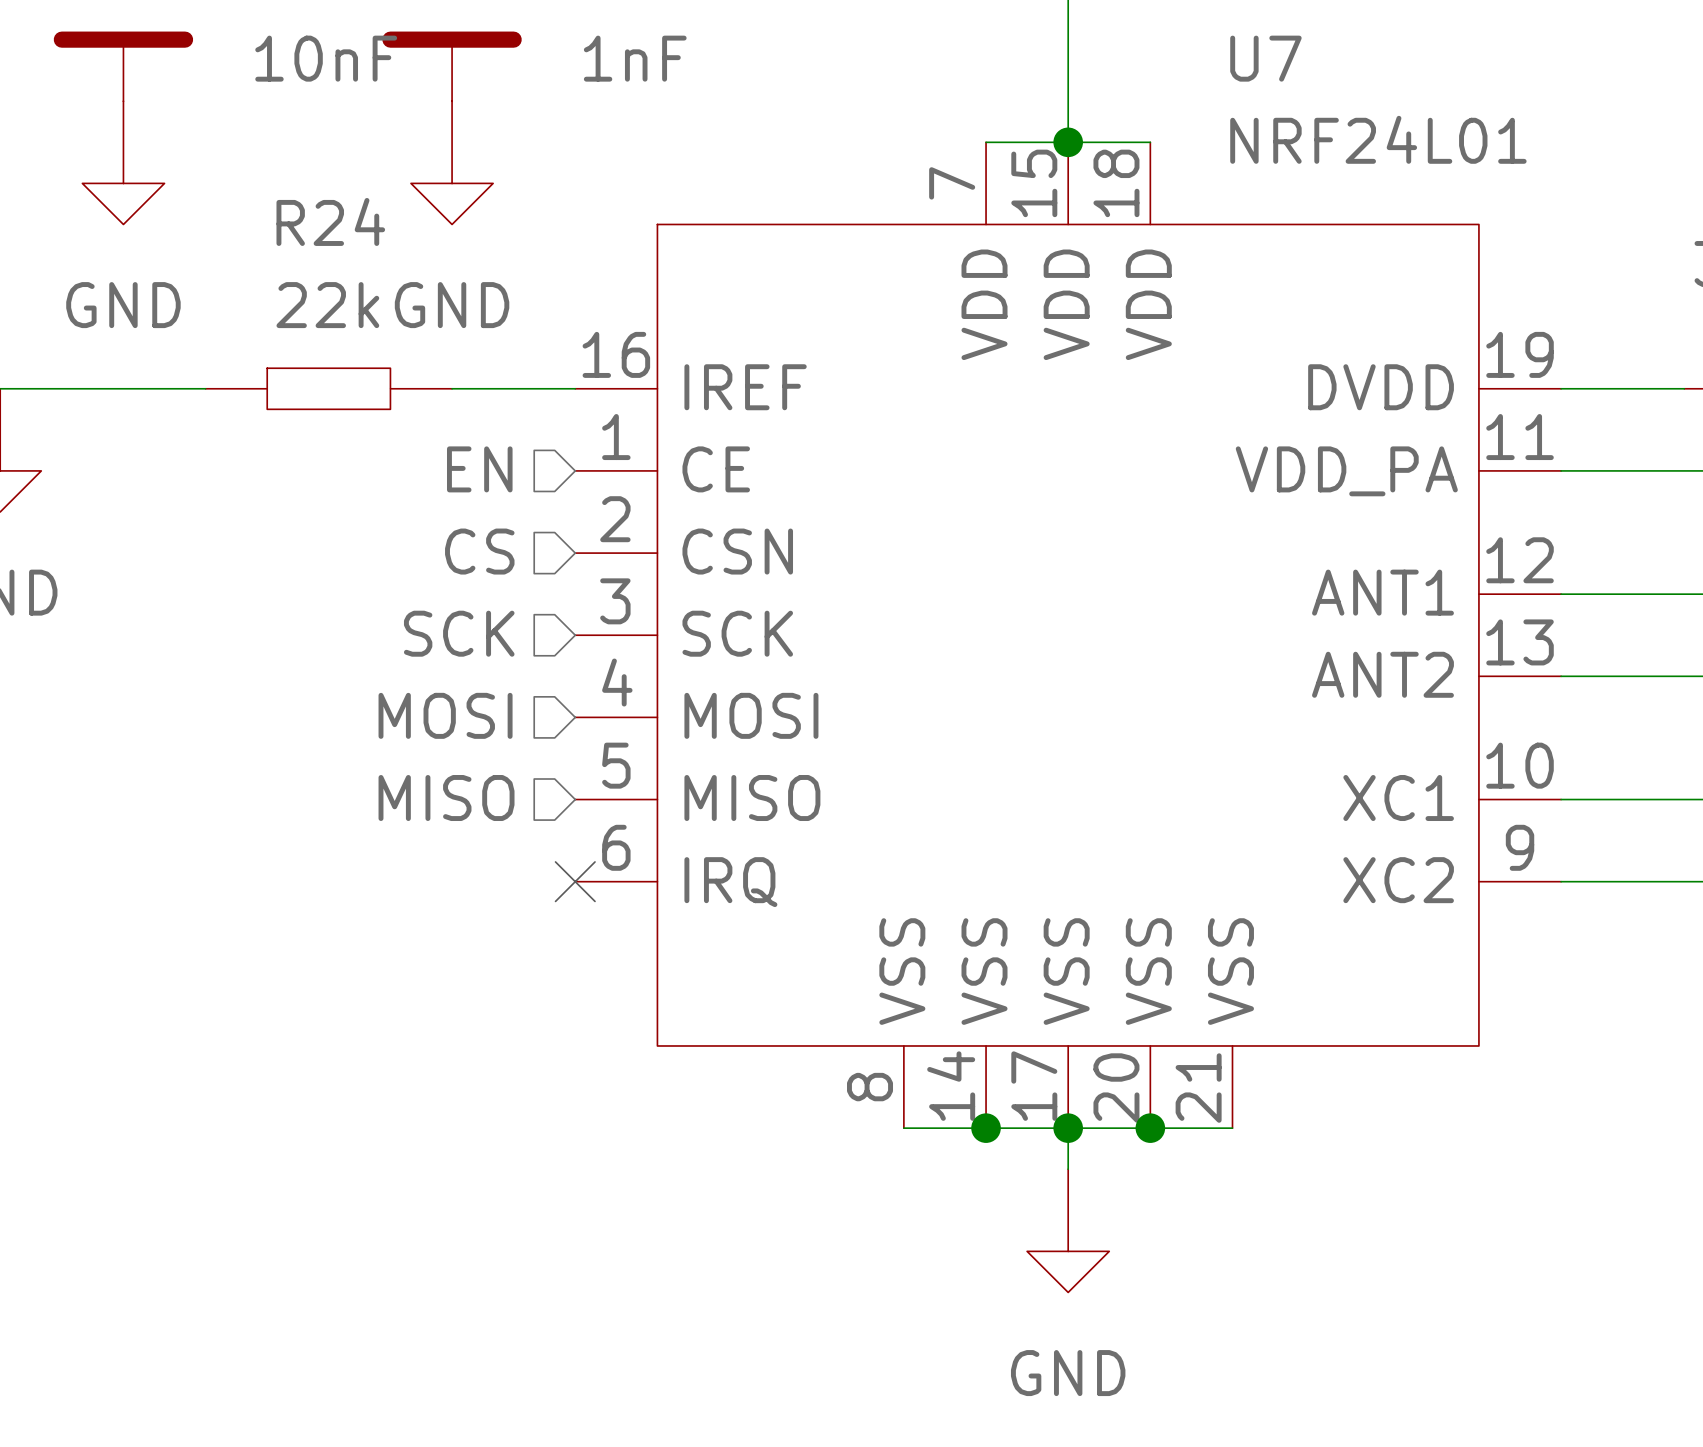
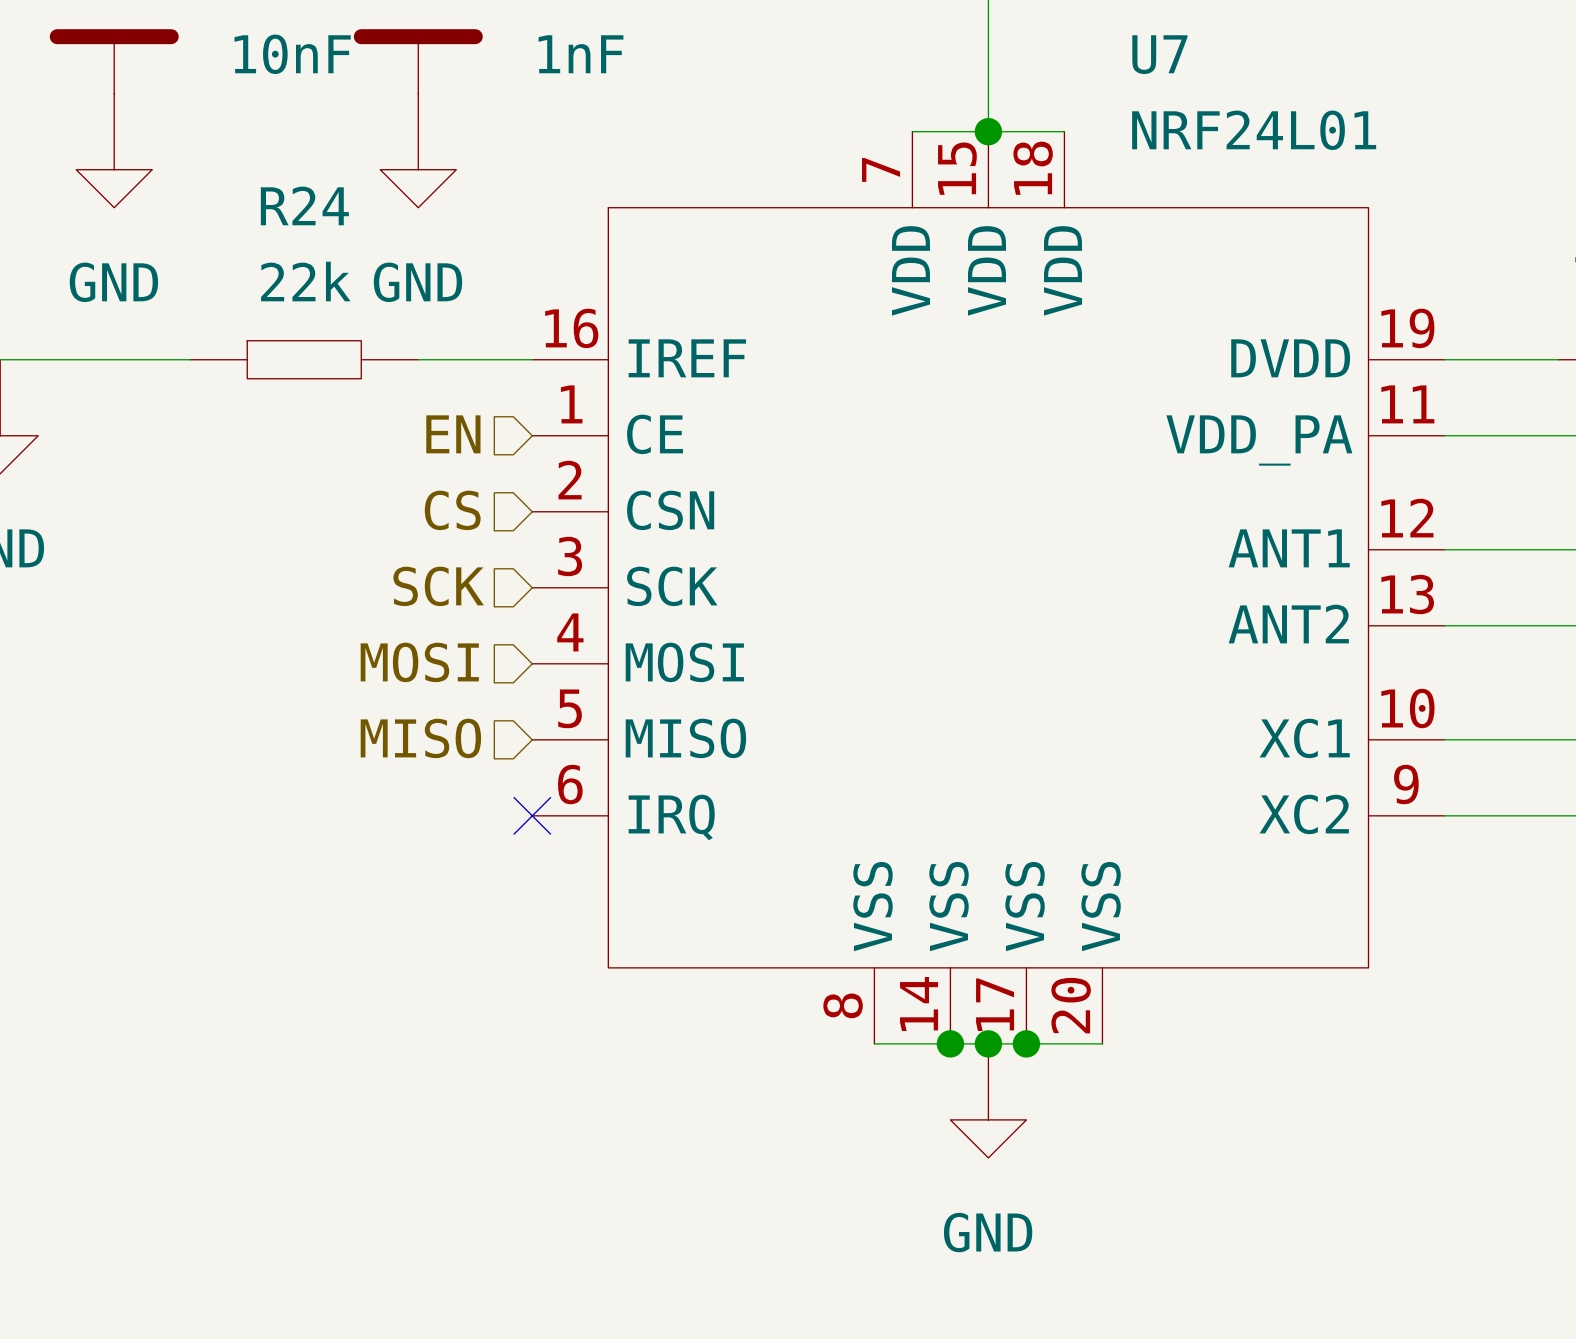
U7 symbol: [575, 142, 1562, 1129] -> [532, 131, 1445, 1044]
wire: (903, 1128) (944, 1128) -> none
junction position: (986, 1128) -> (950, 1043)
junction position: (1150, 1128) -> (1026, 1043)
wire: (1191, 1128) (1232, 1128) -> none
power symbol position: GND (1068, 1230) -> GND (988, 1100)

